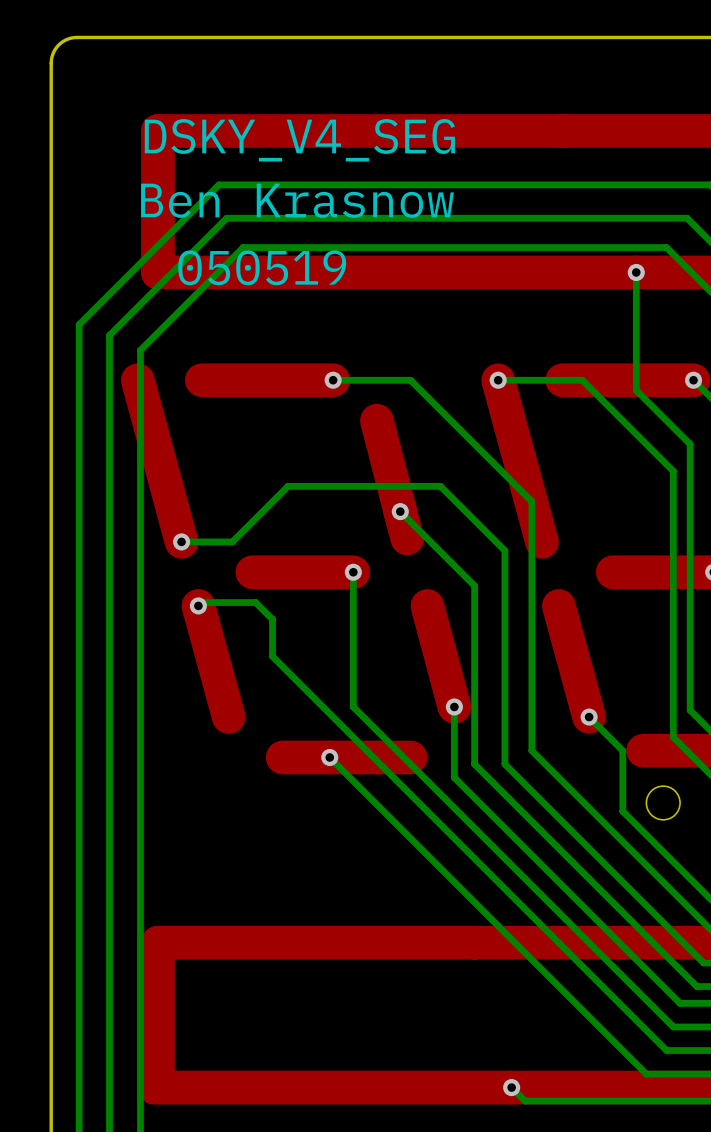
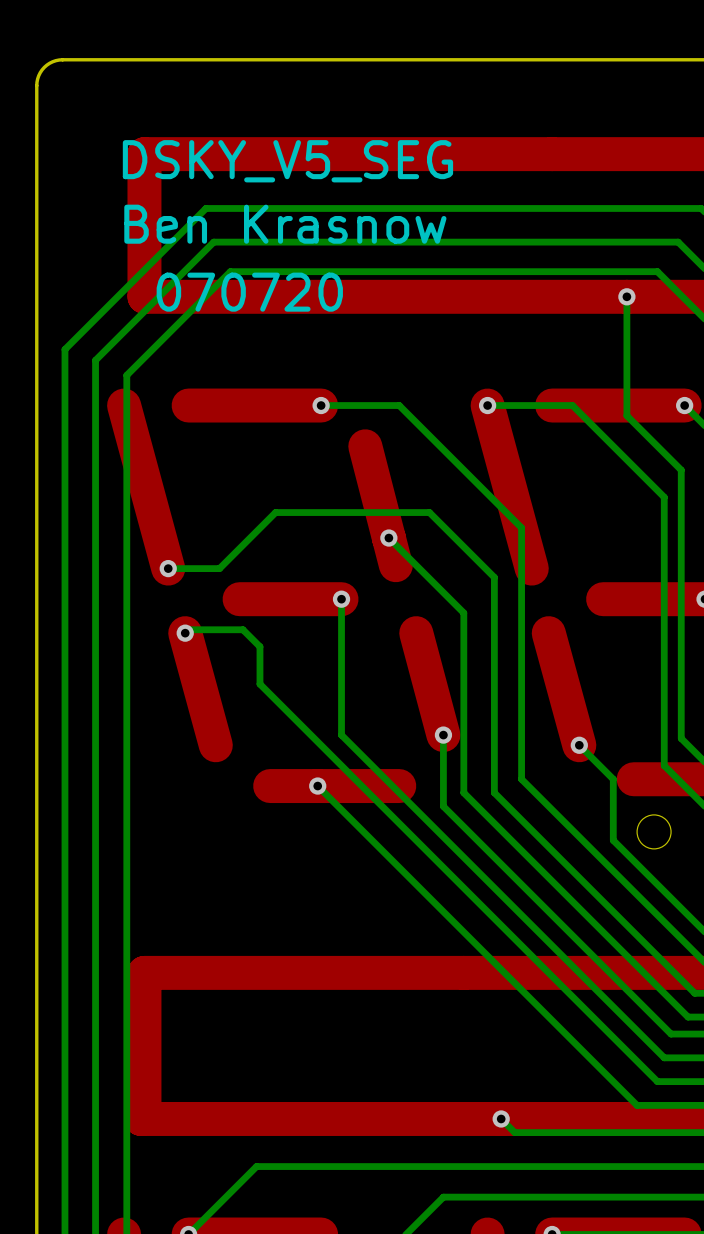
text: DSKY_V4_SEG (299, 140) -> DSKY_V5_SEG (287, 161)
text: 050519 (262, 267) -> 070720 (249, 292)

